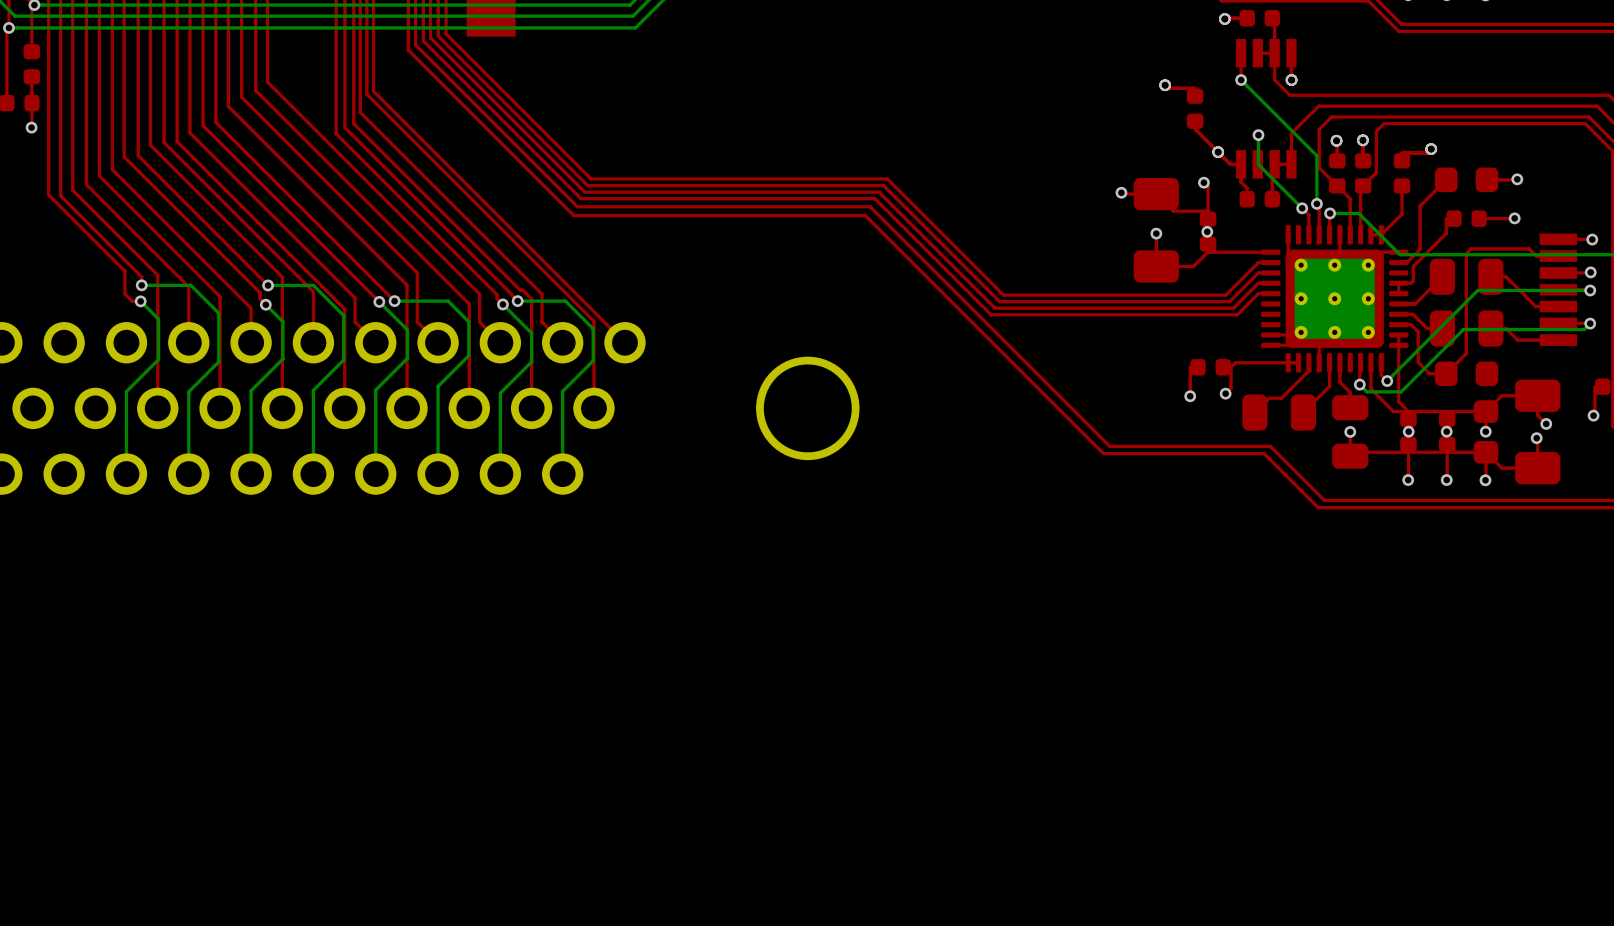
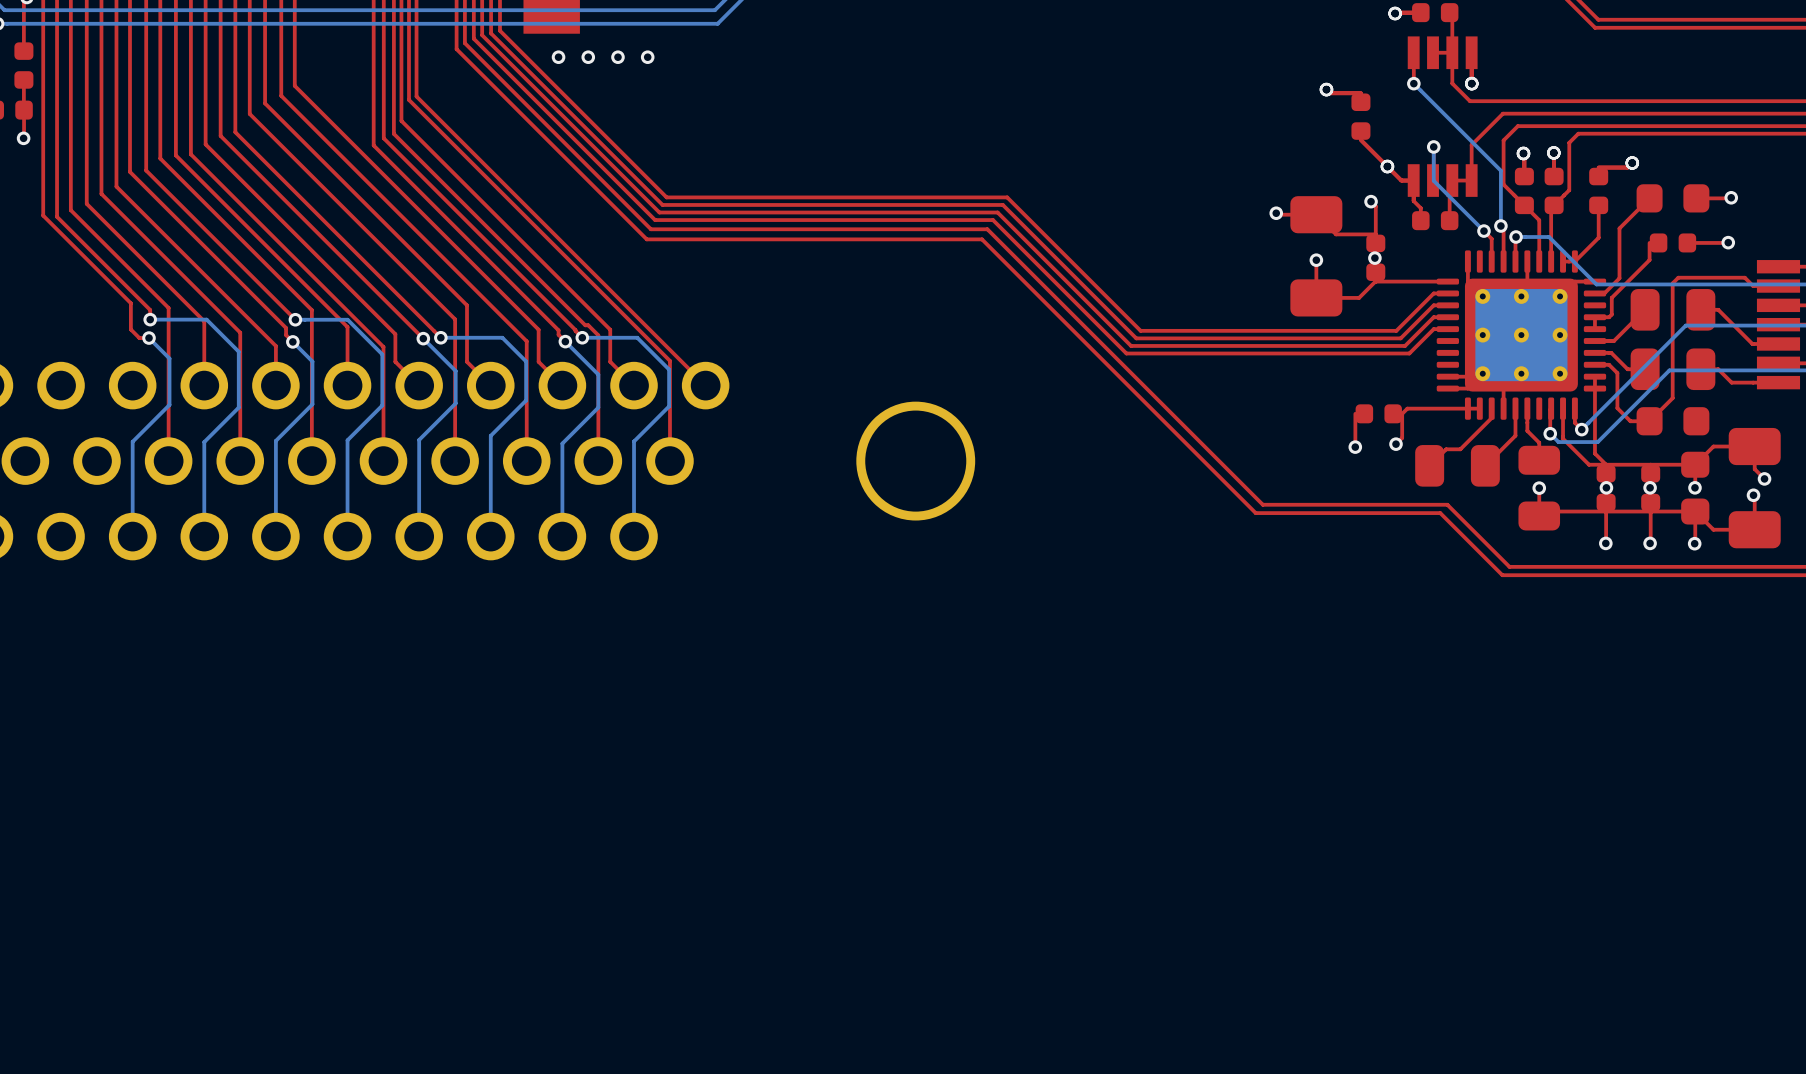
via: none -> (558, 57)
via: none -> (588, 57)
via: none -> (617, 57)
via: none -> (647, 57)

